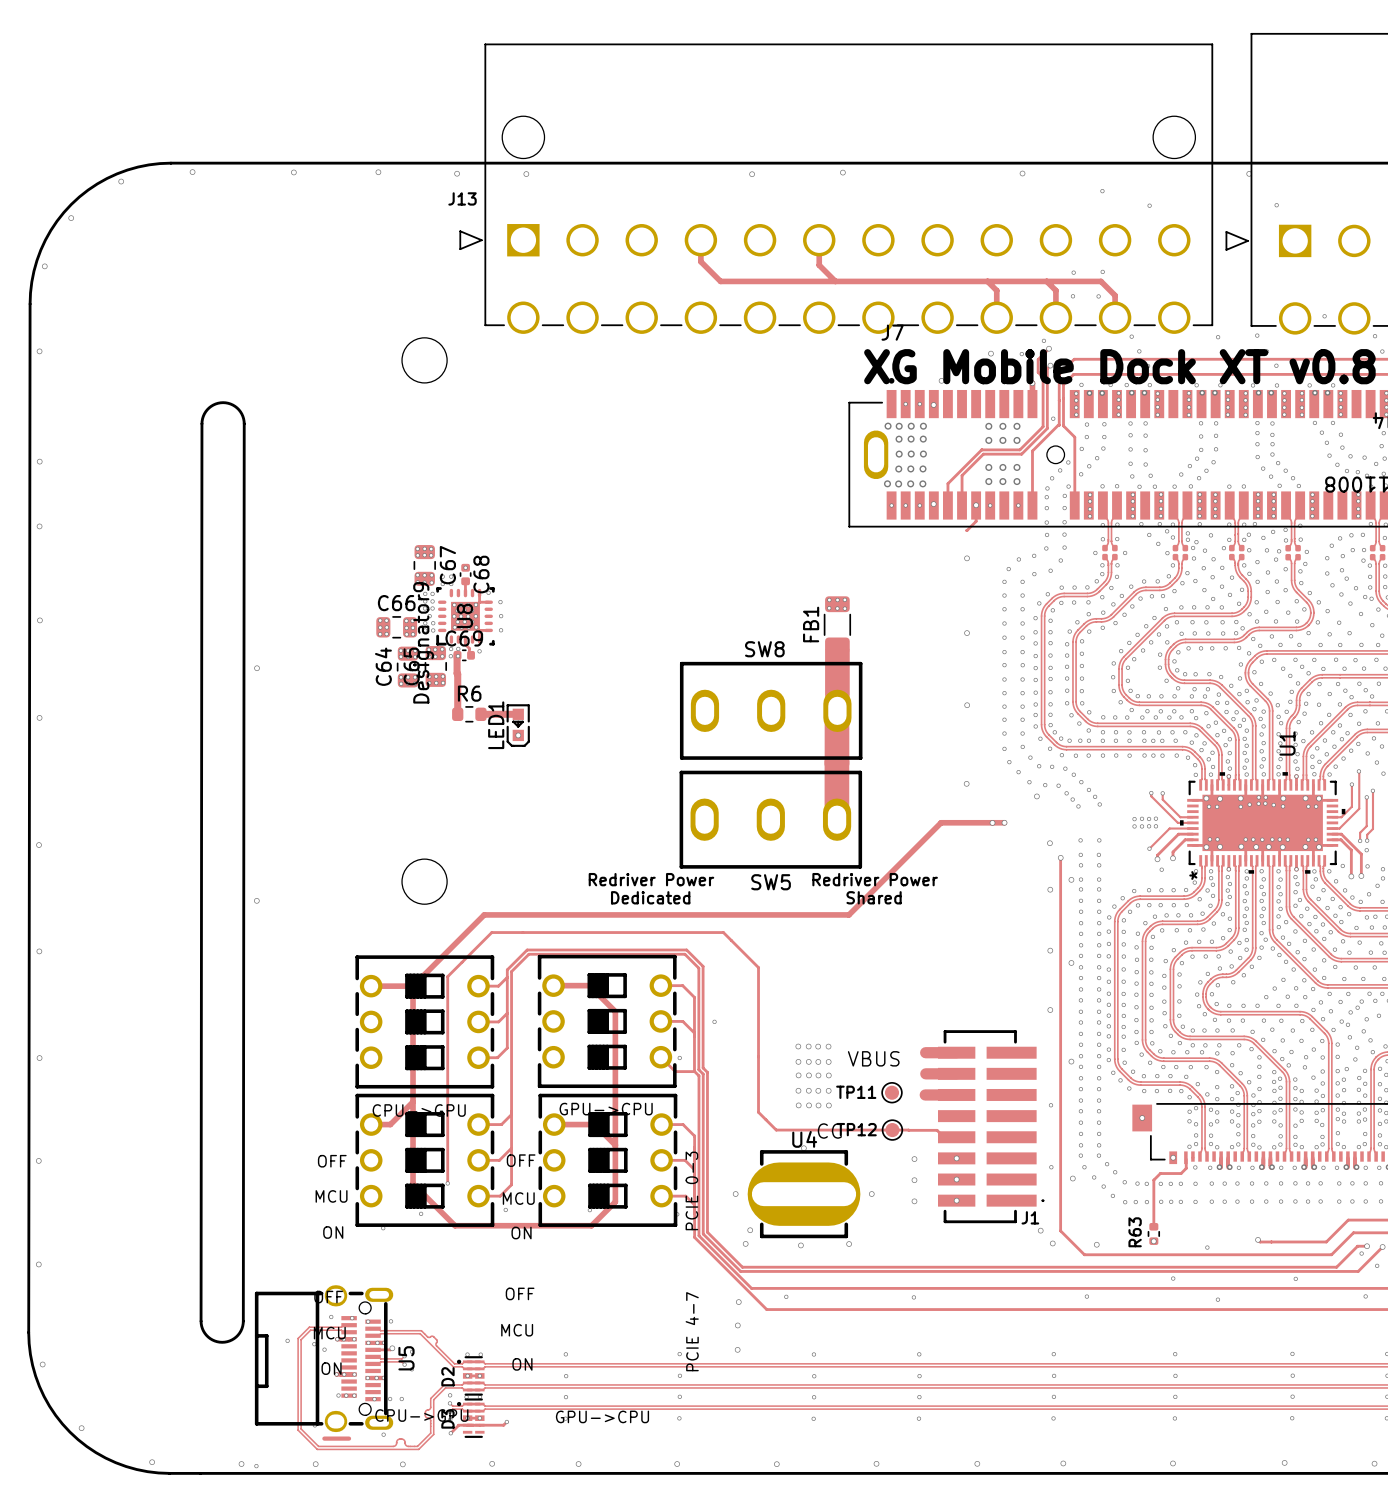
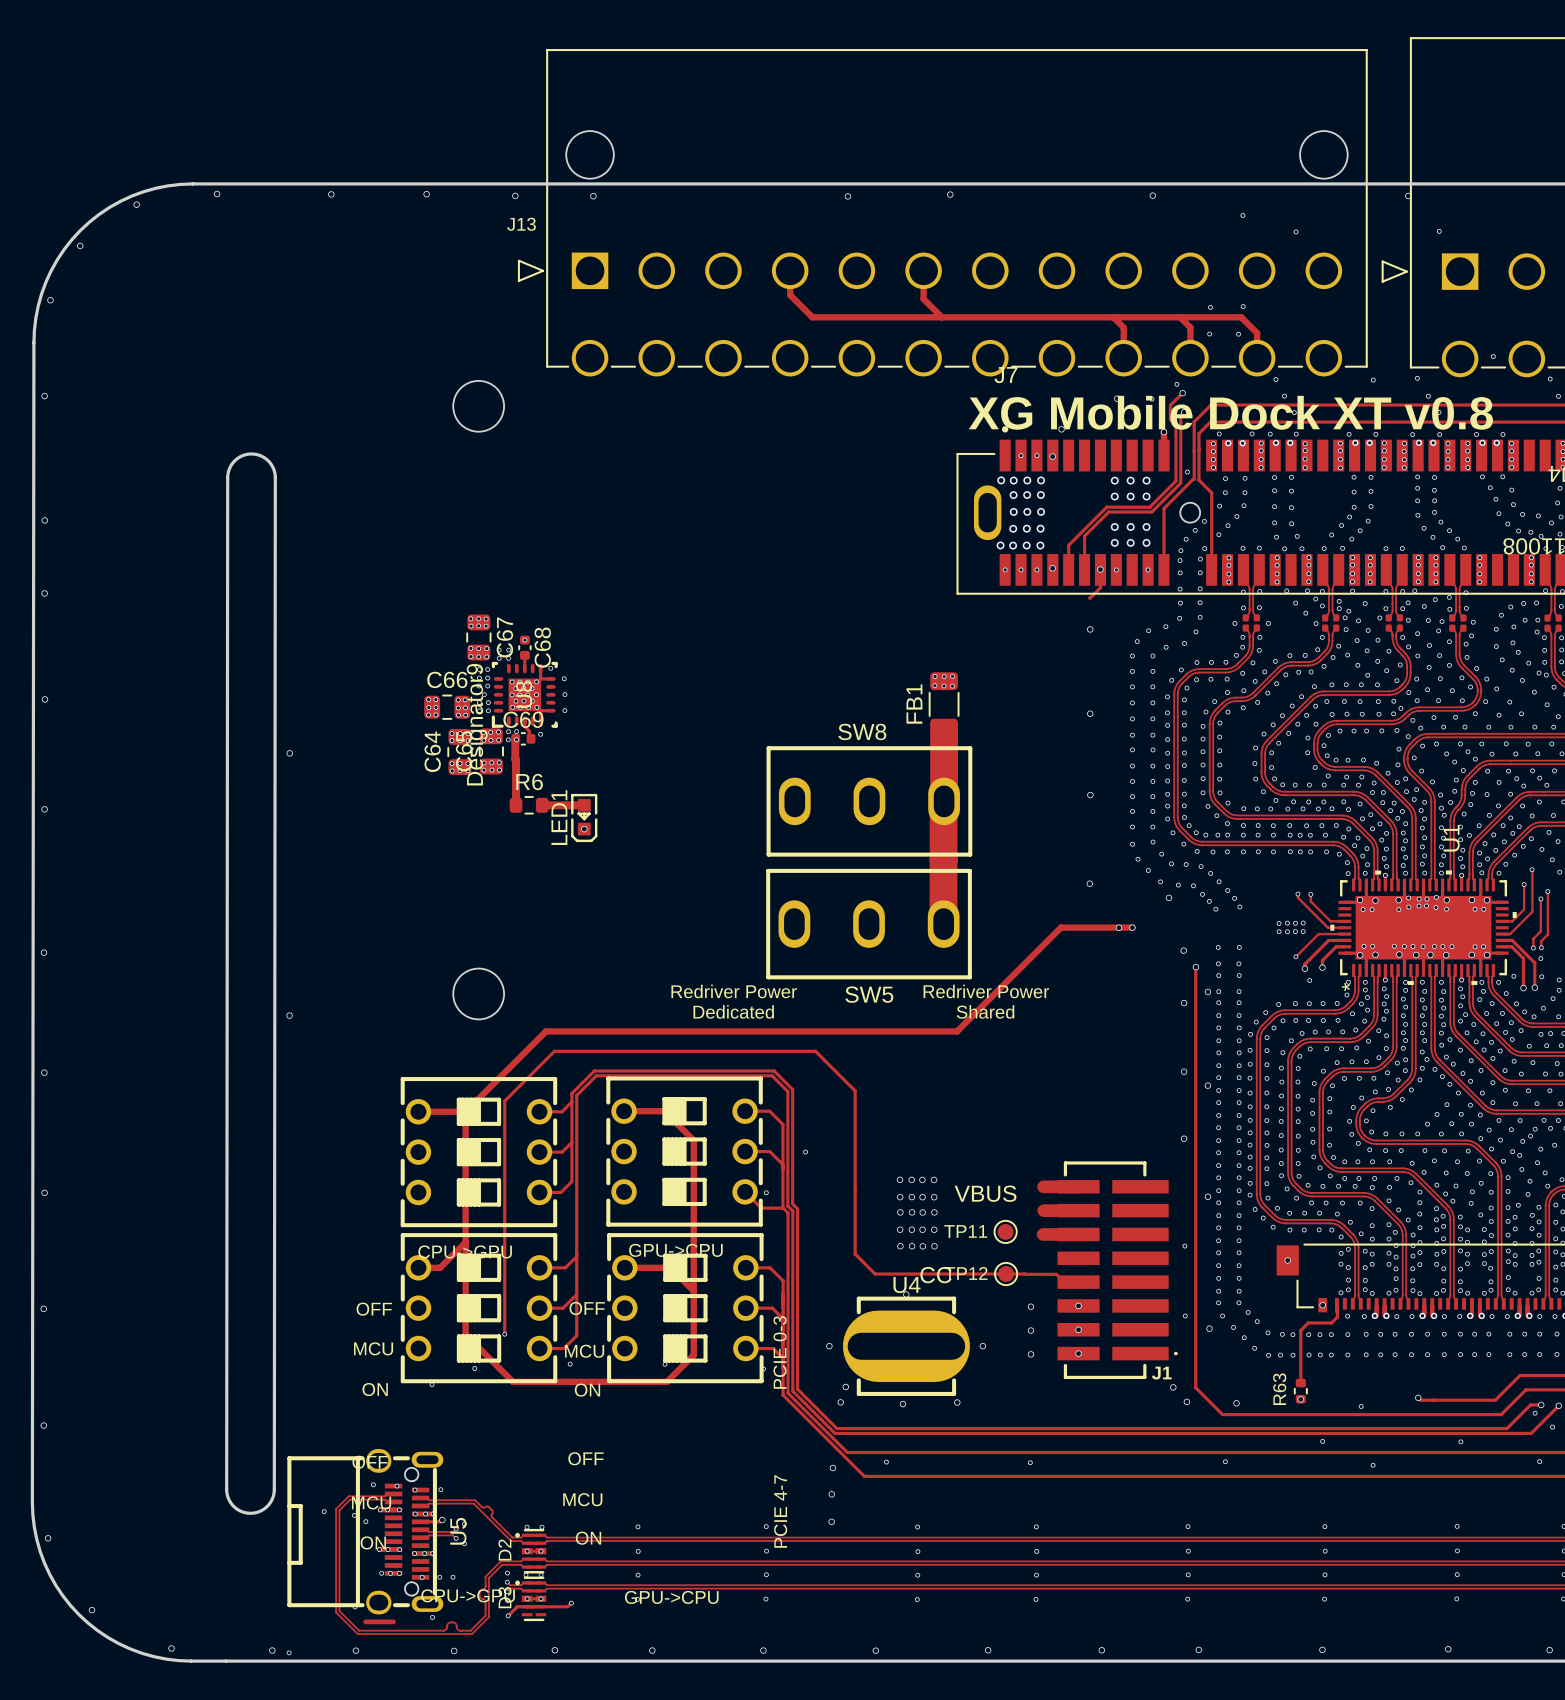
via: none -> (1436, 897)
via: none -> (1408, 897)
via: none -> (1394, 946)

